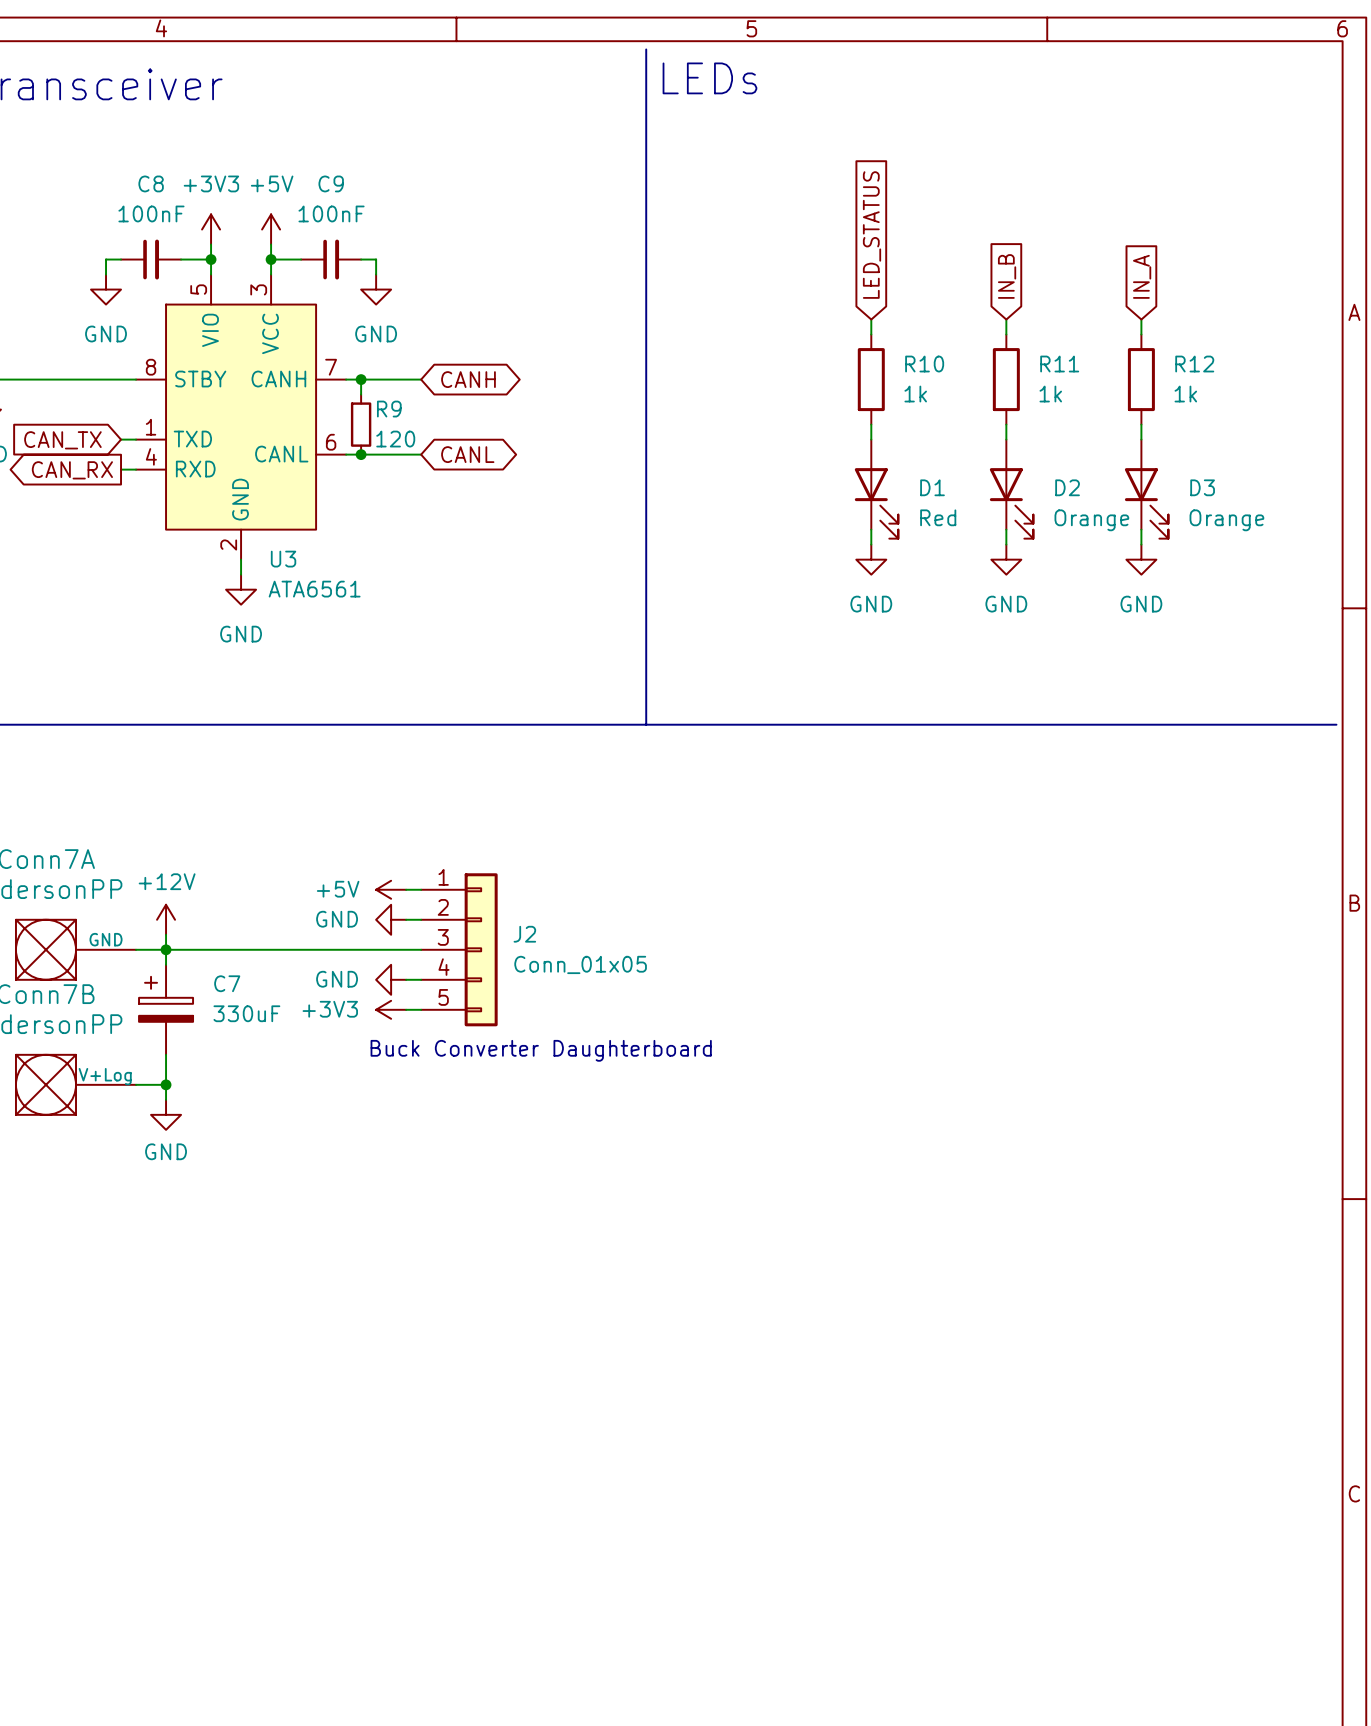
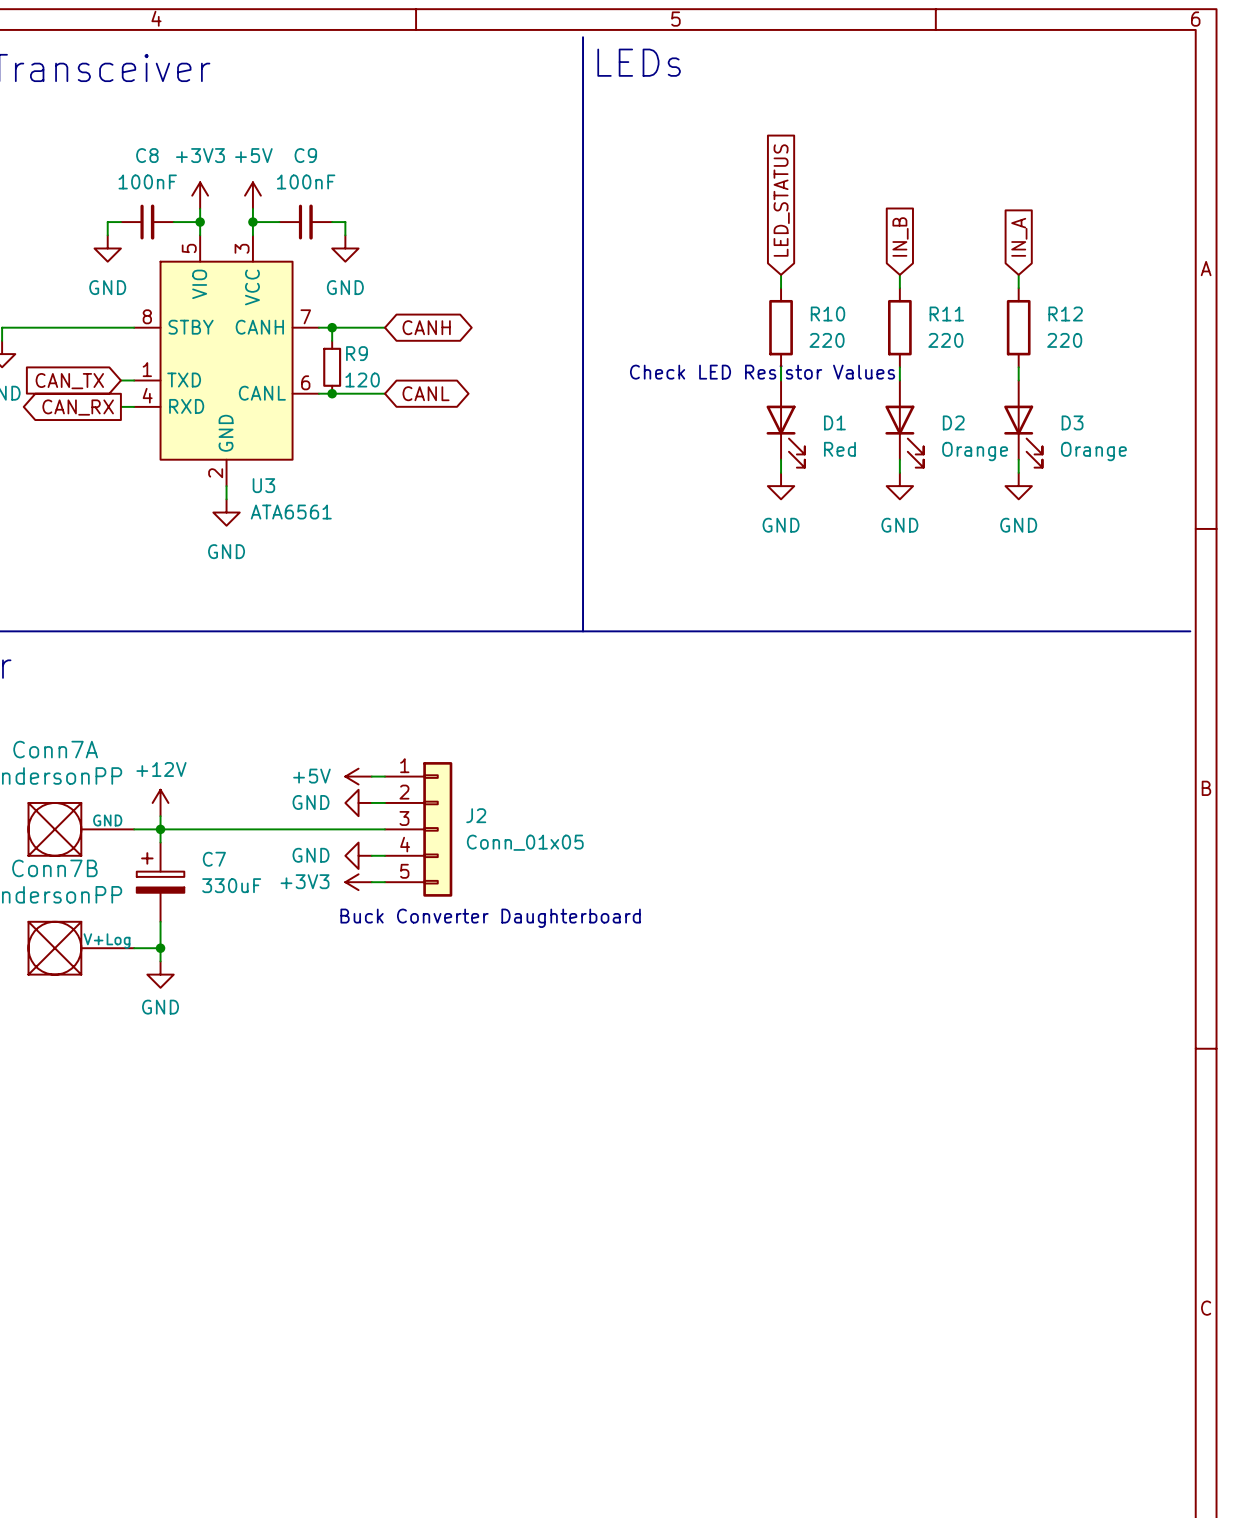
R10 value: 1k (915, 394) -> 220 (827, 340)
R11 value: 1k (1050, 394) -> 220 (945, 340)
R12 value: 1k (1185, 394) -> 220 (1064, 340)
text: none -> Check LED Resistor Values (762, 372)

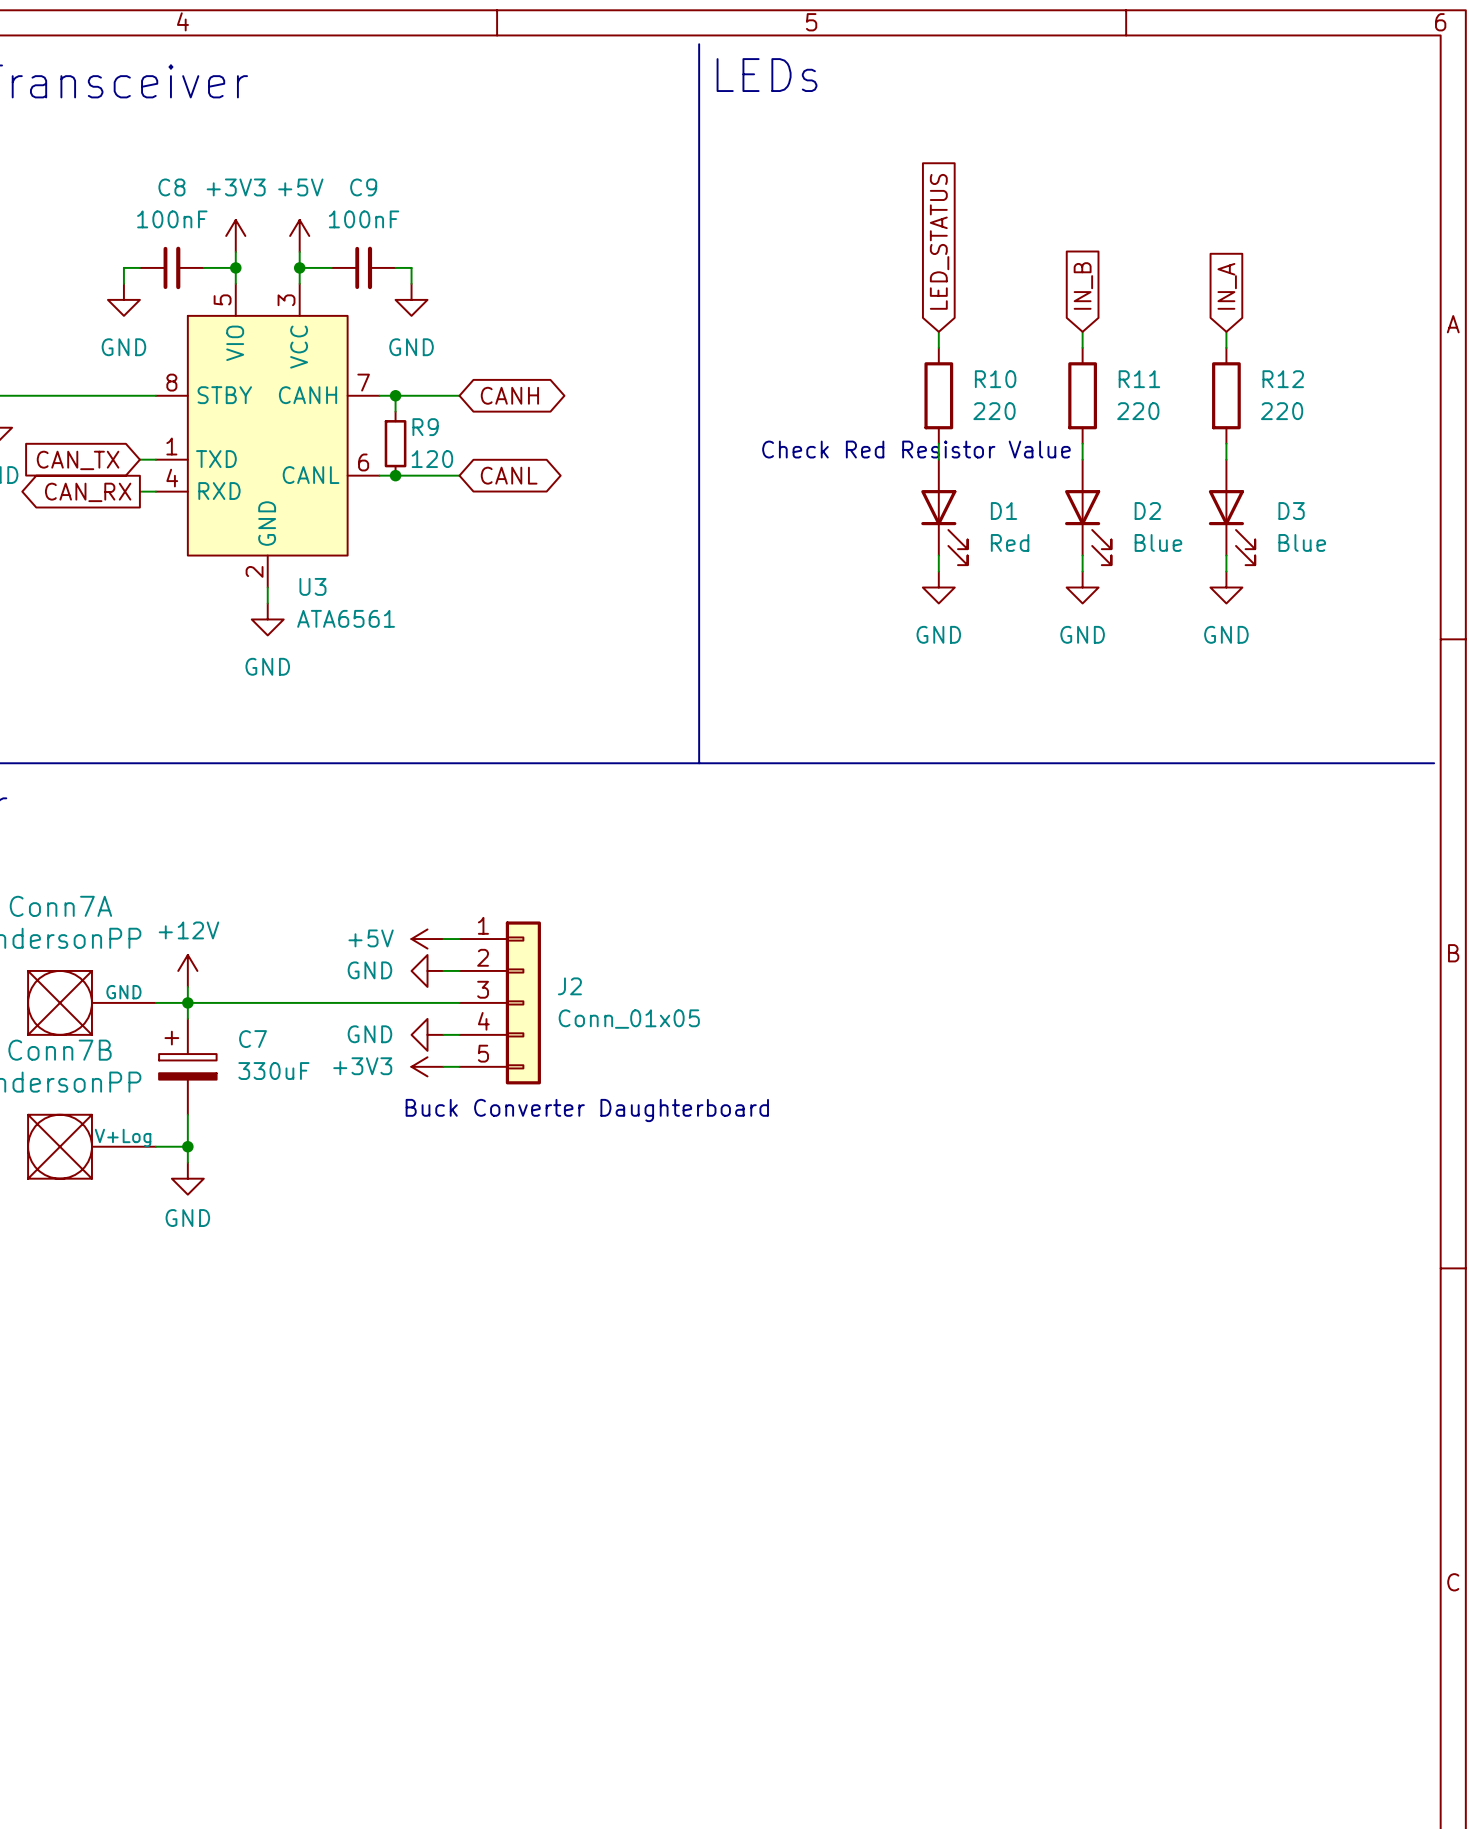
text: Check LED Resistor Values (762, 372) -> Check Red Resistor Value (916, 449)
D2 value: Orange (975, 451) -> Blue (1158, 542)
D3 value: Orange (1093, 451) -> Blue (1302, 542)

